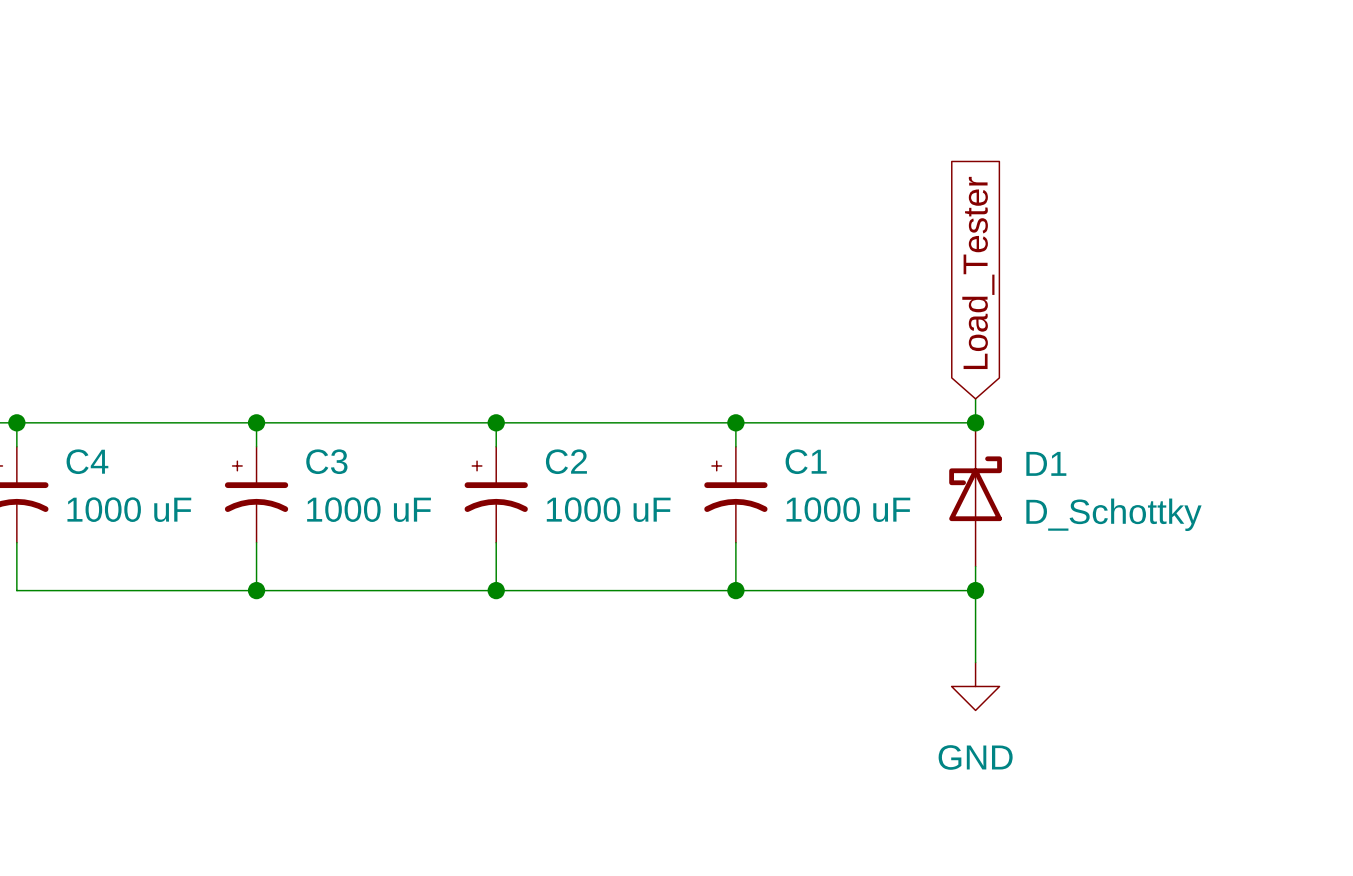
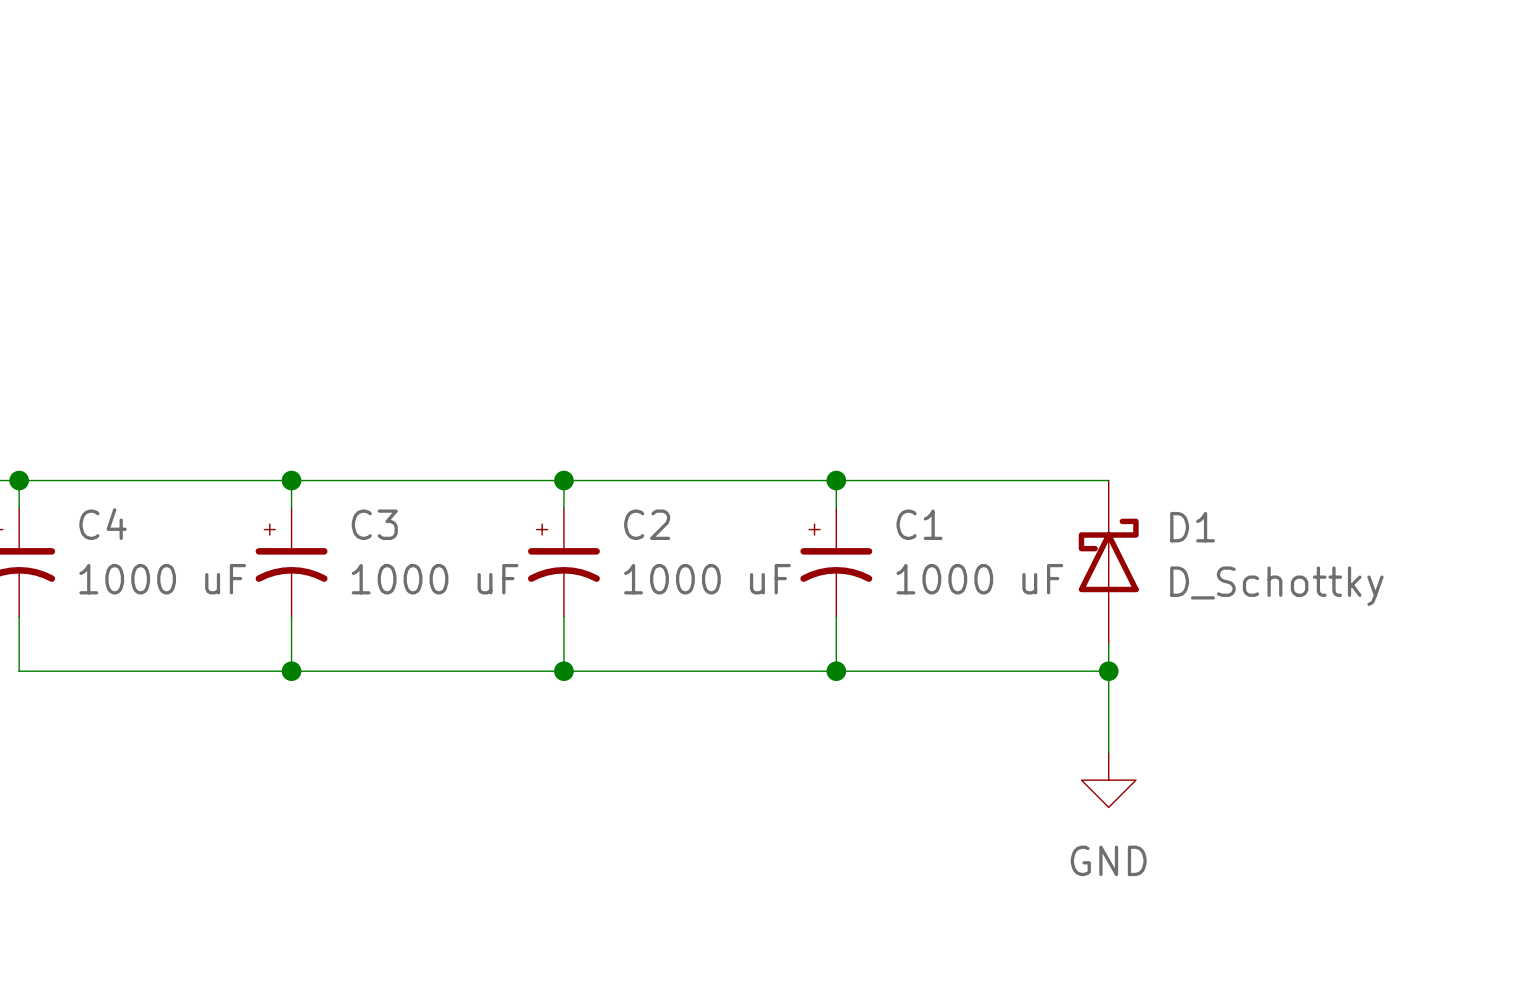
global label: Load_Tester (978, 272) -> none
wire: (975, 398) (975, 422) -> none
junction: (975, 422) -> none

